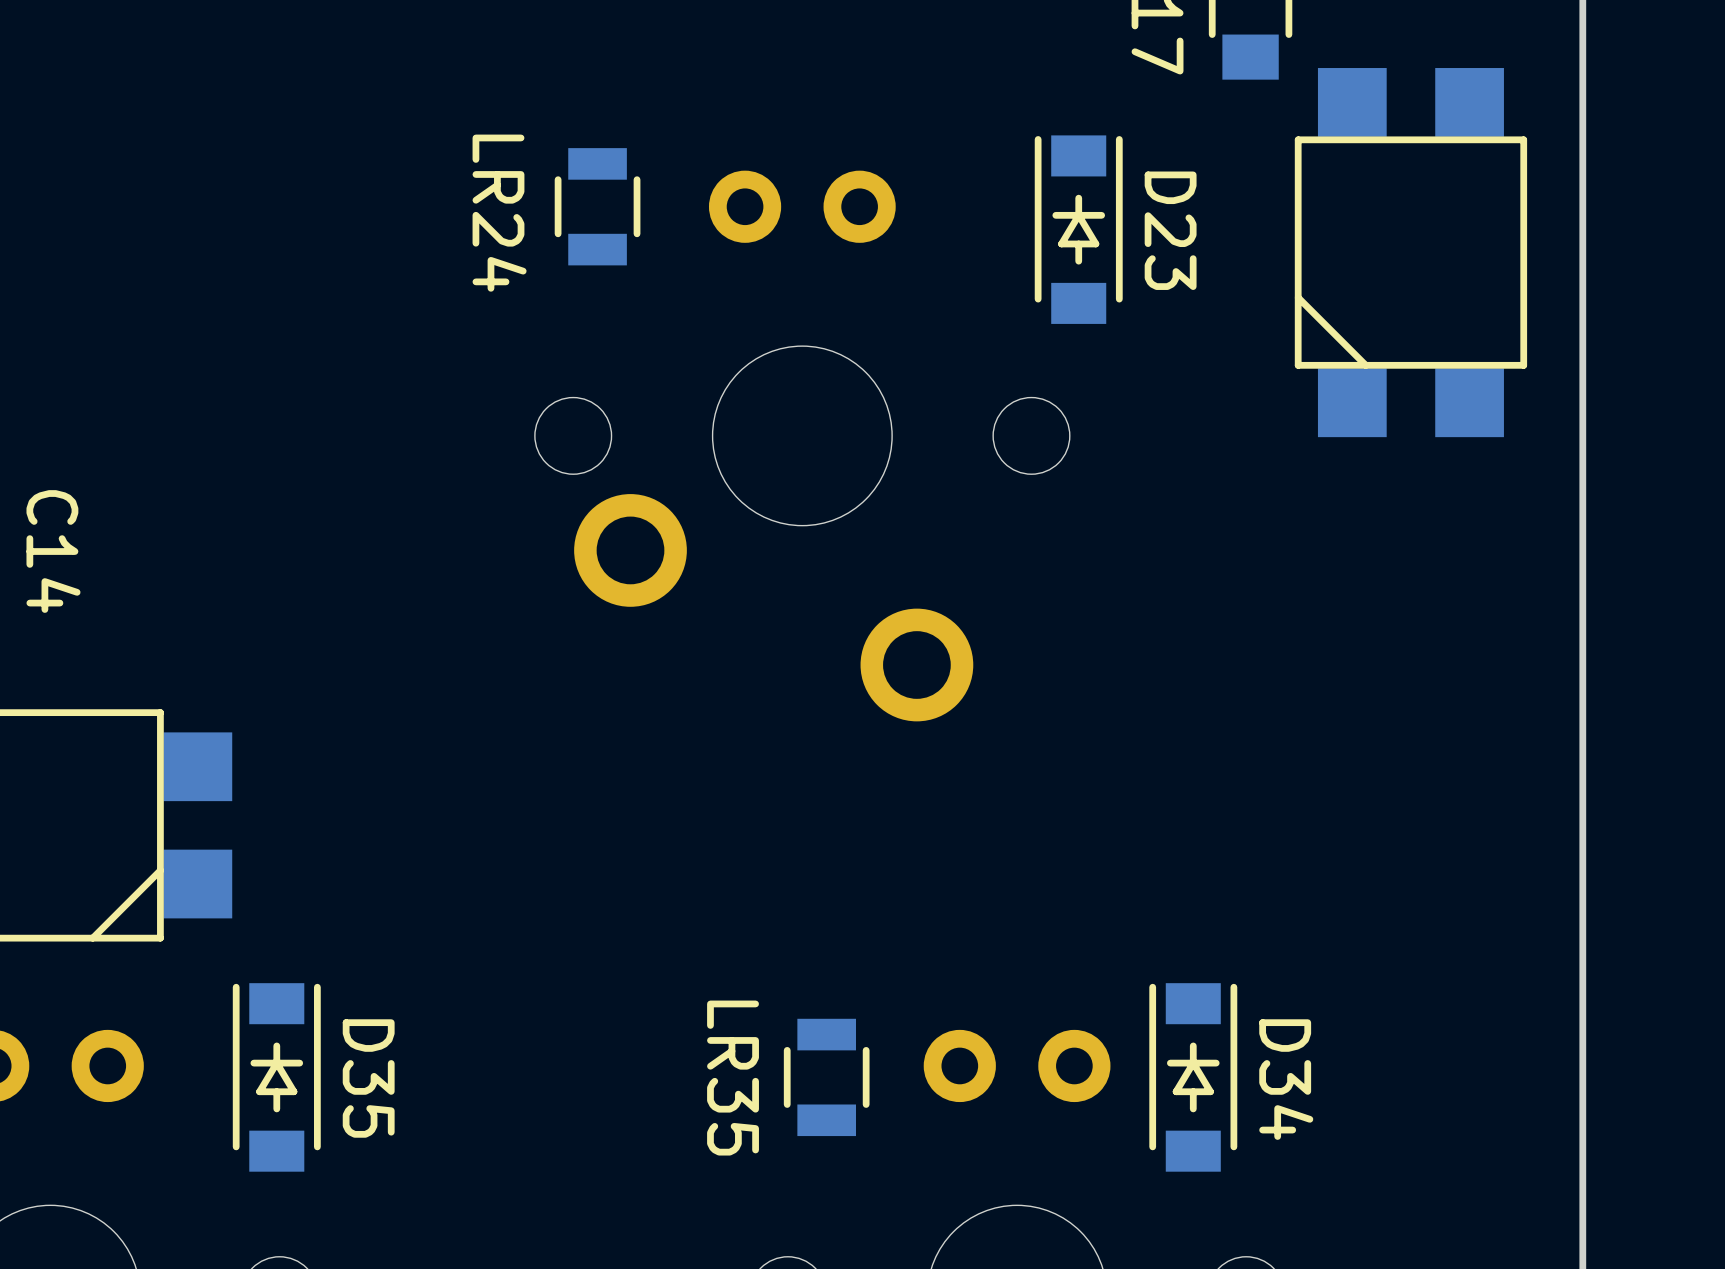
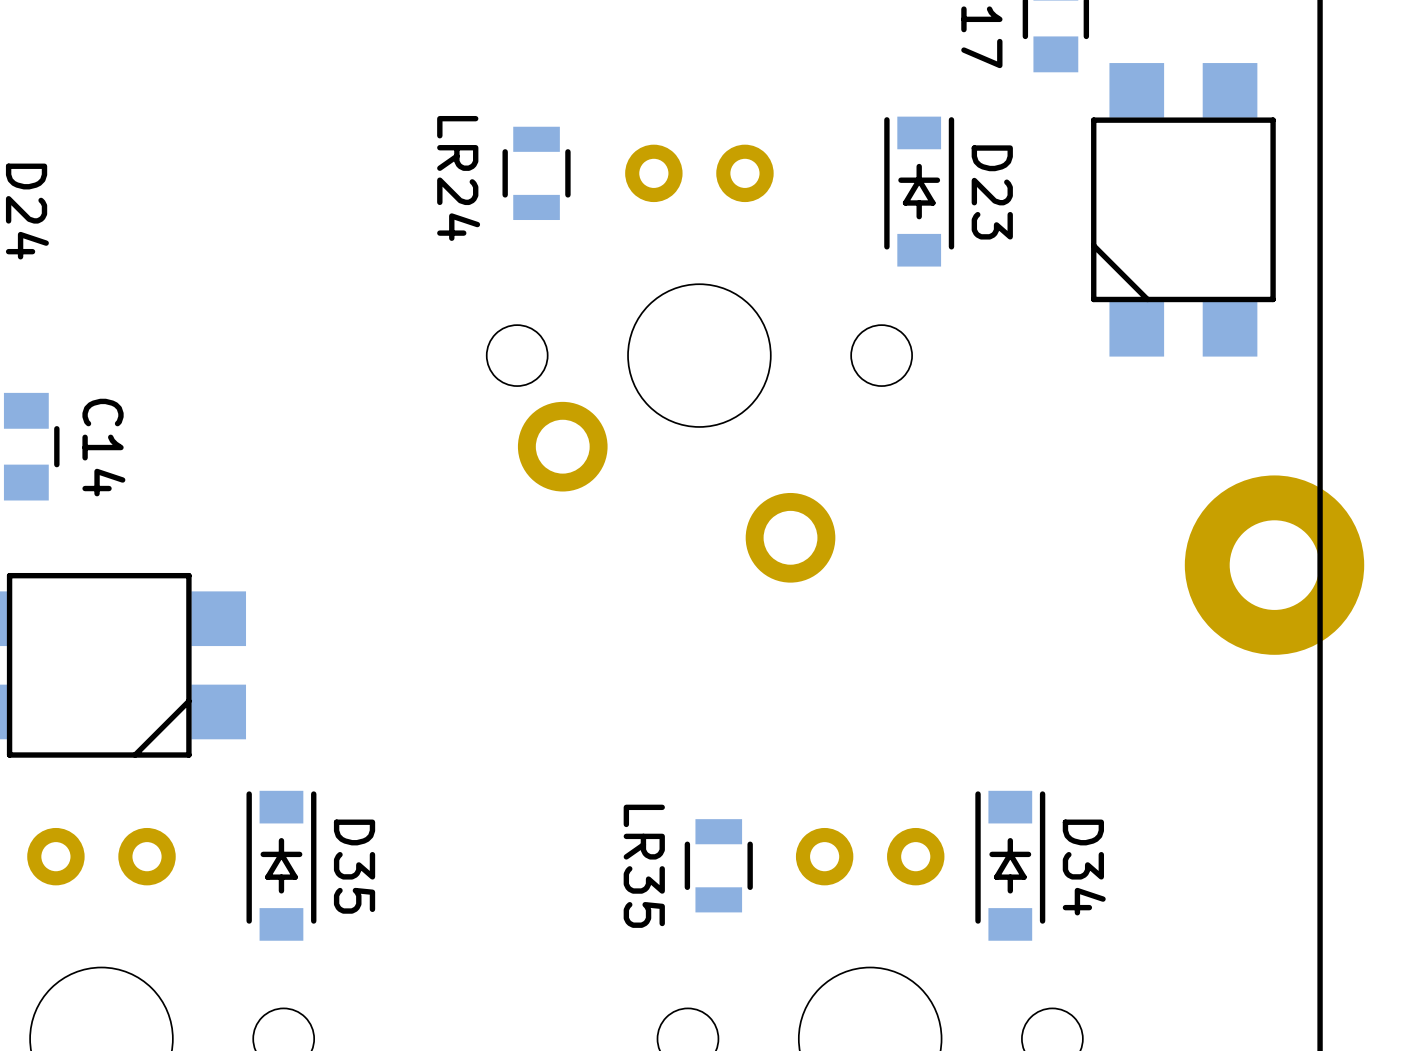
part: none -> (1274, 565)

